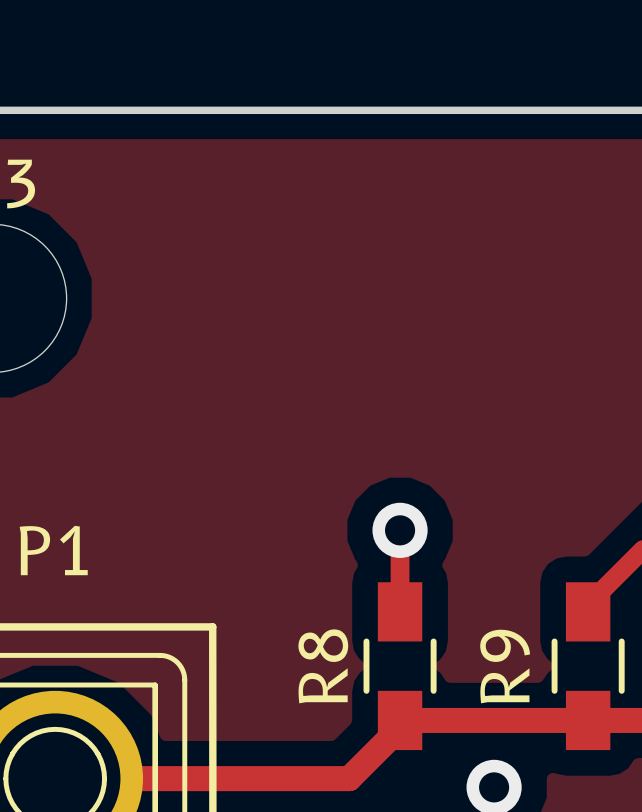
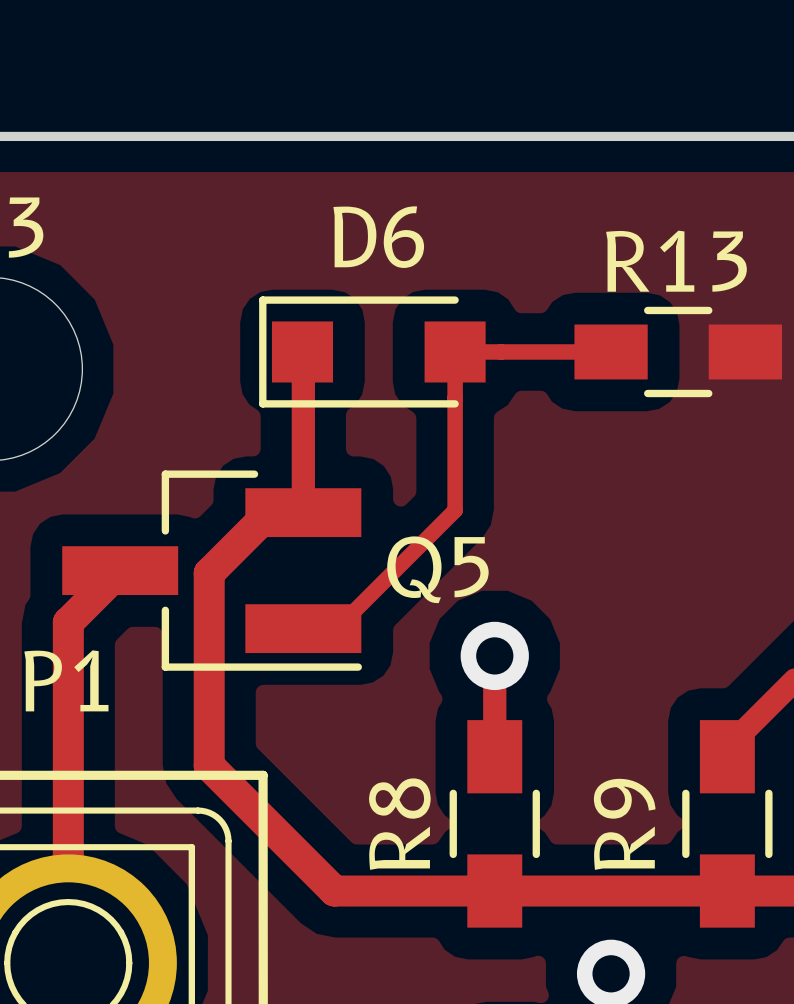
D6: none -> (372, 351)
track: none -> (611, 351) (455, 351) (455, 510) (336, 628) (303, 628)
R13: none -> (678, 351)
track: none -> (303, 352) (303, 512) (269, 512) (209, 573) (209, 765) (334, 891) (494, 891)
Q5: none -> (212, 570)
track: (400, 727) (349, 778) (55, 778) -> (120, 570) (68, 622) (68, 962)

